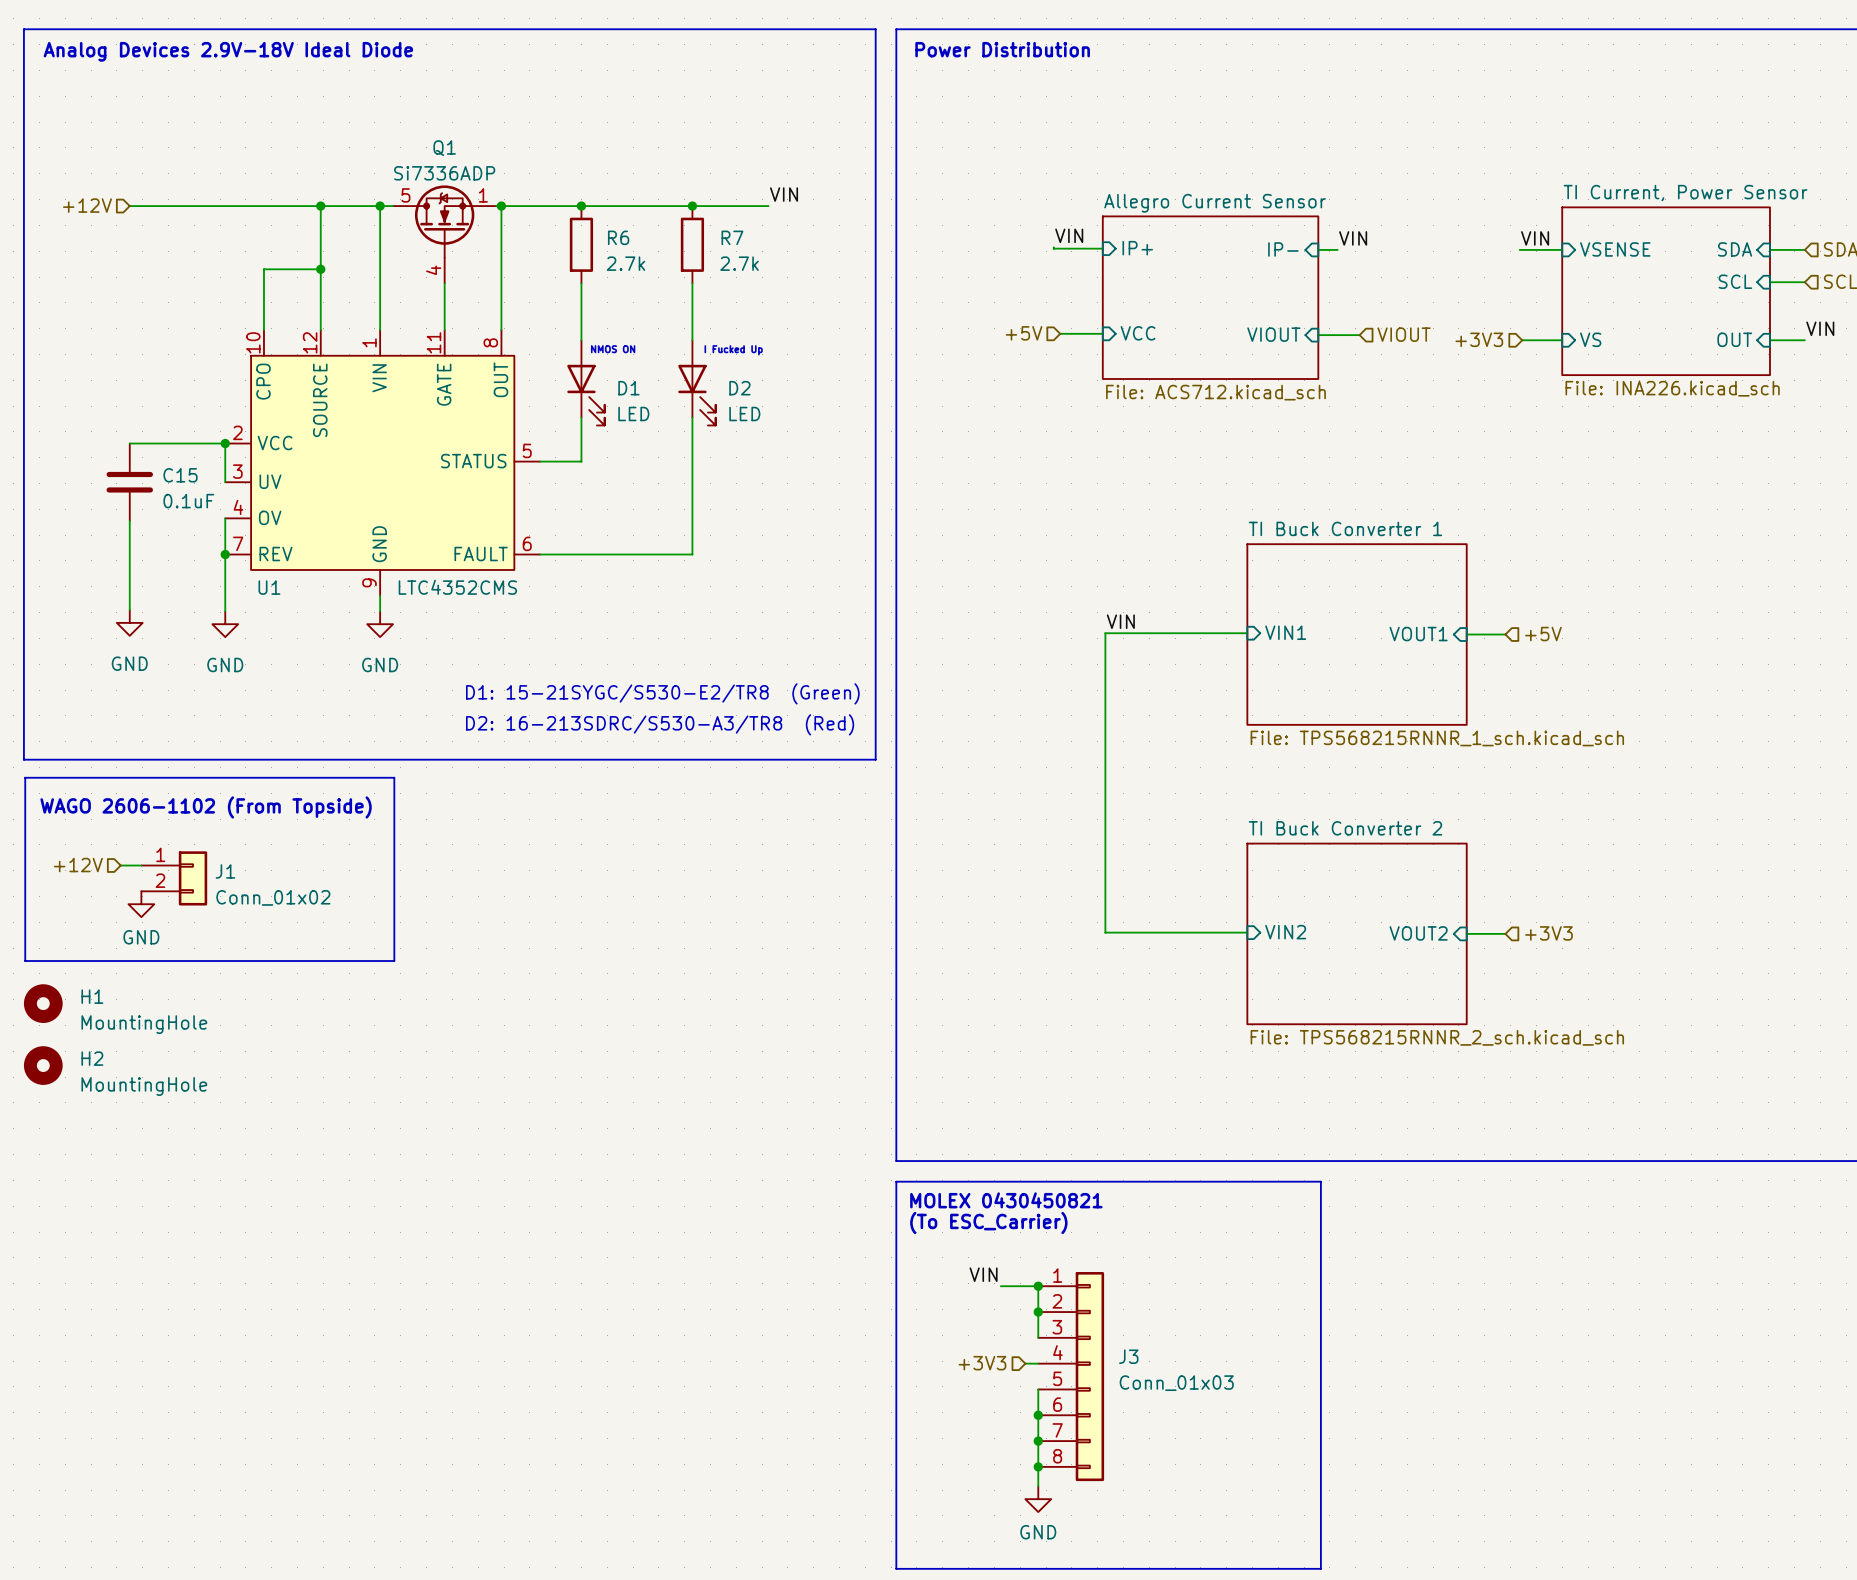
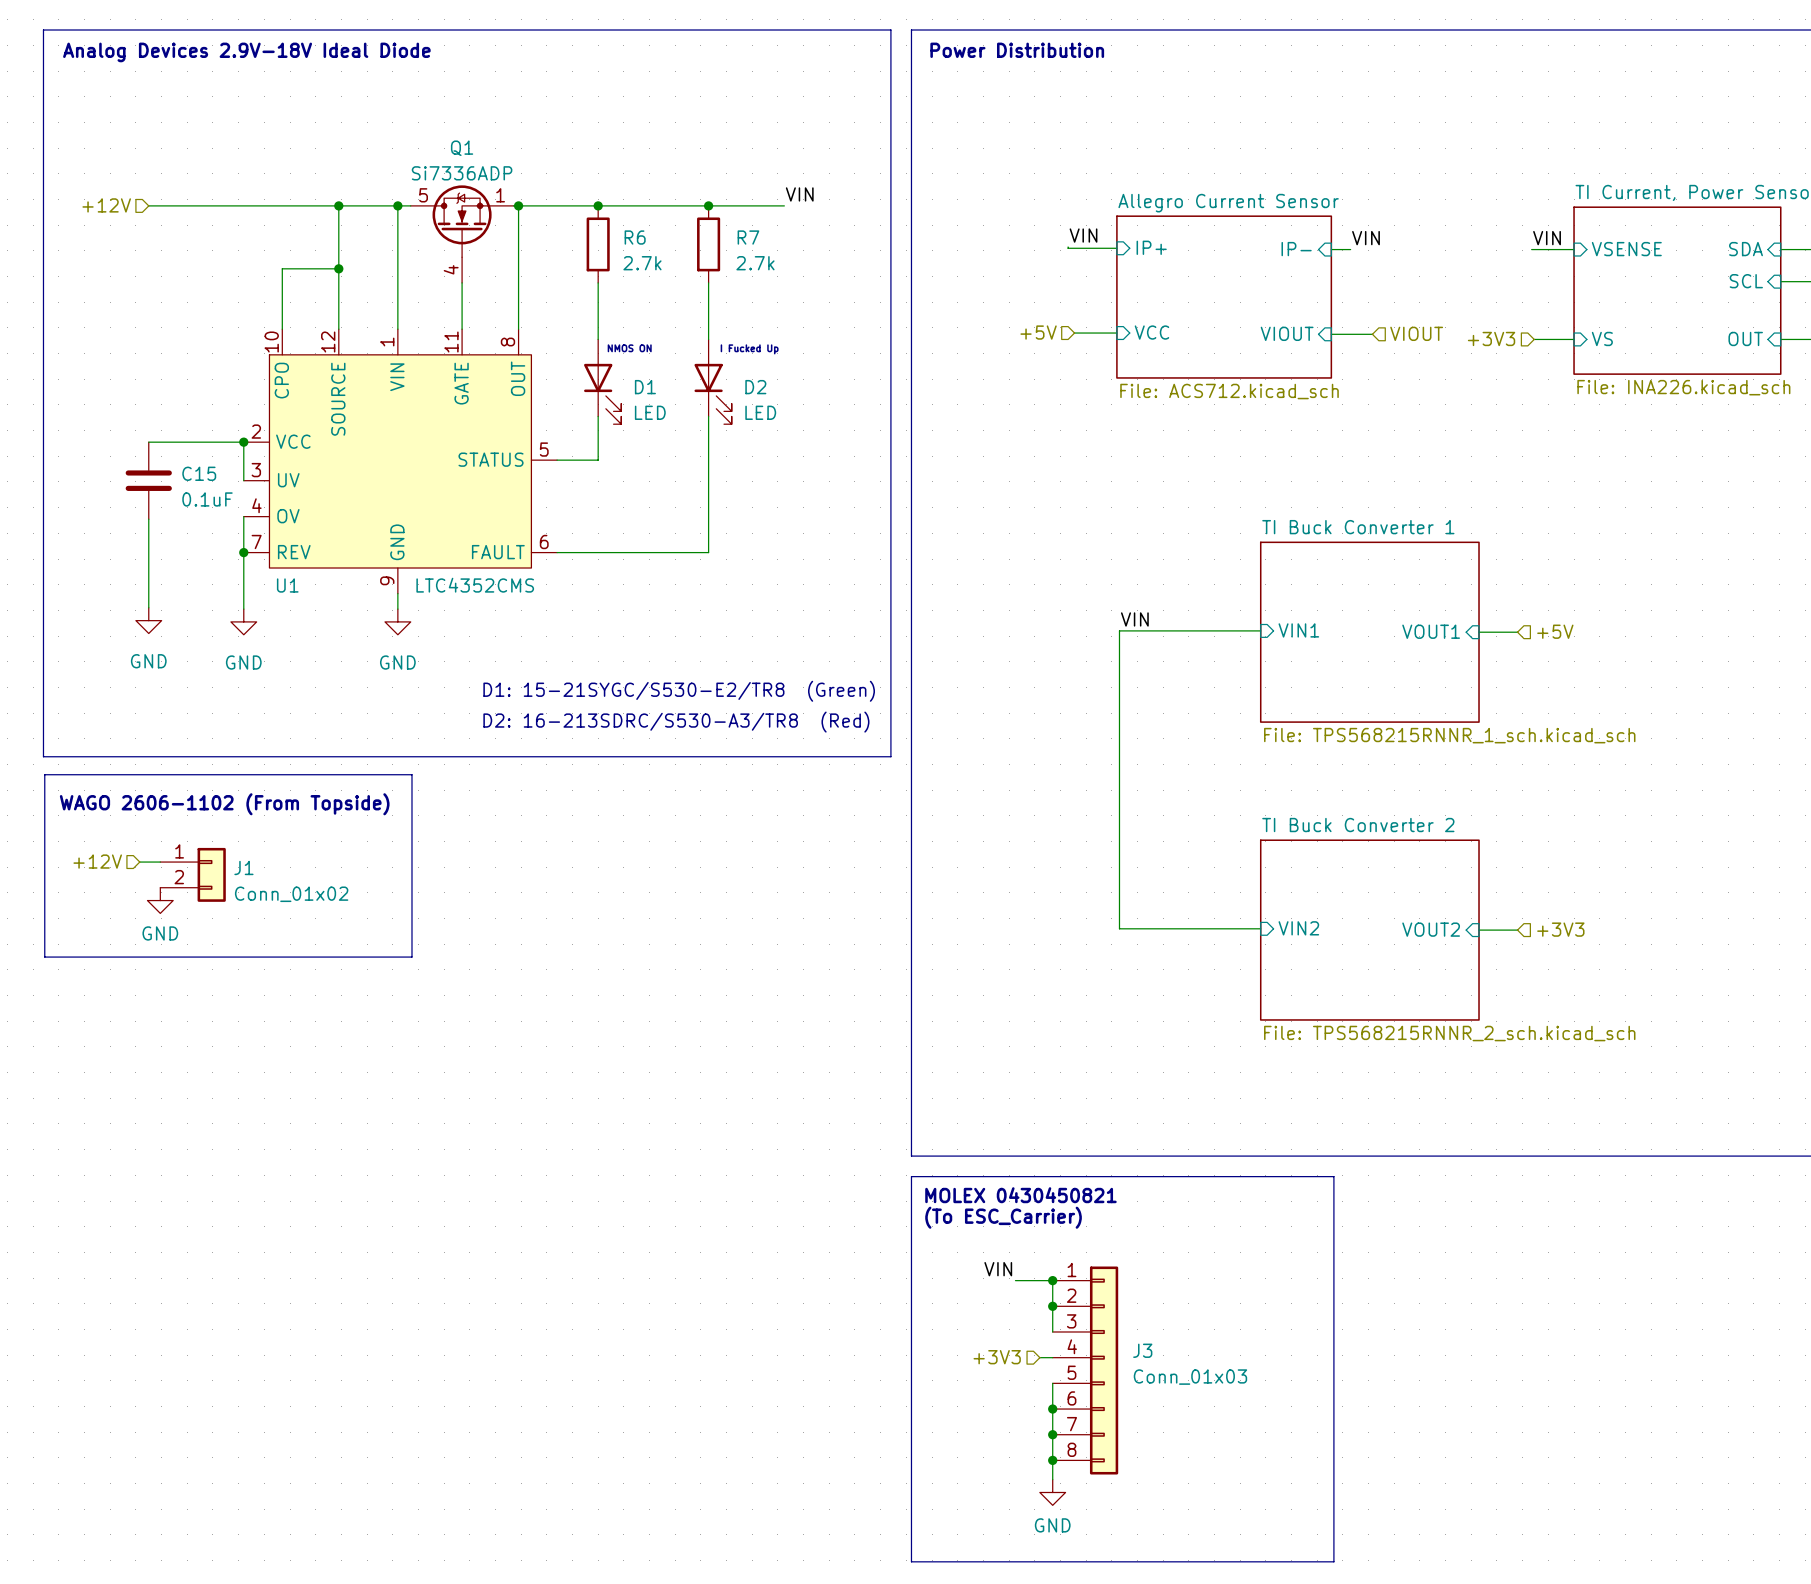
H1: MountingHole (43, 1003) -> none
H2: MountingHole (43, 1065) -> none

